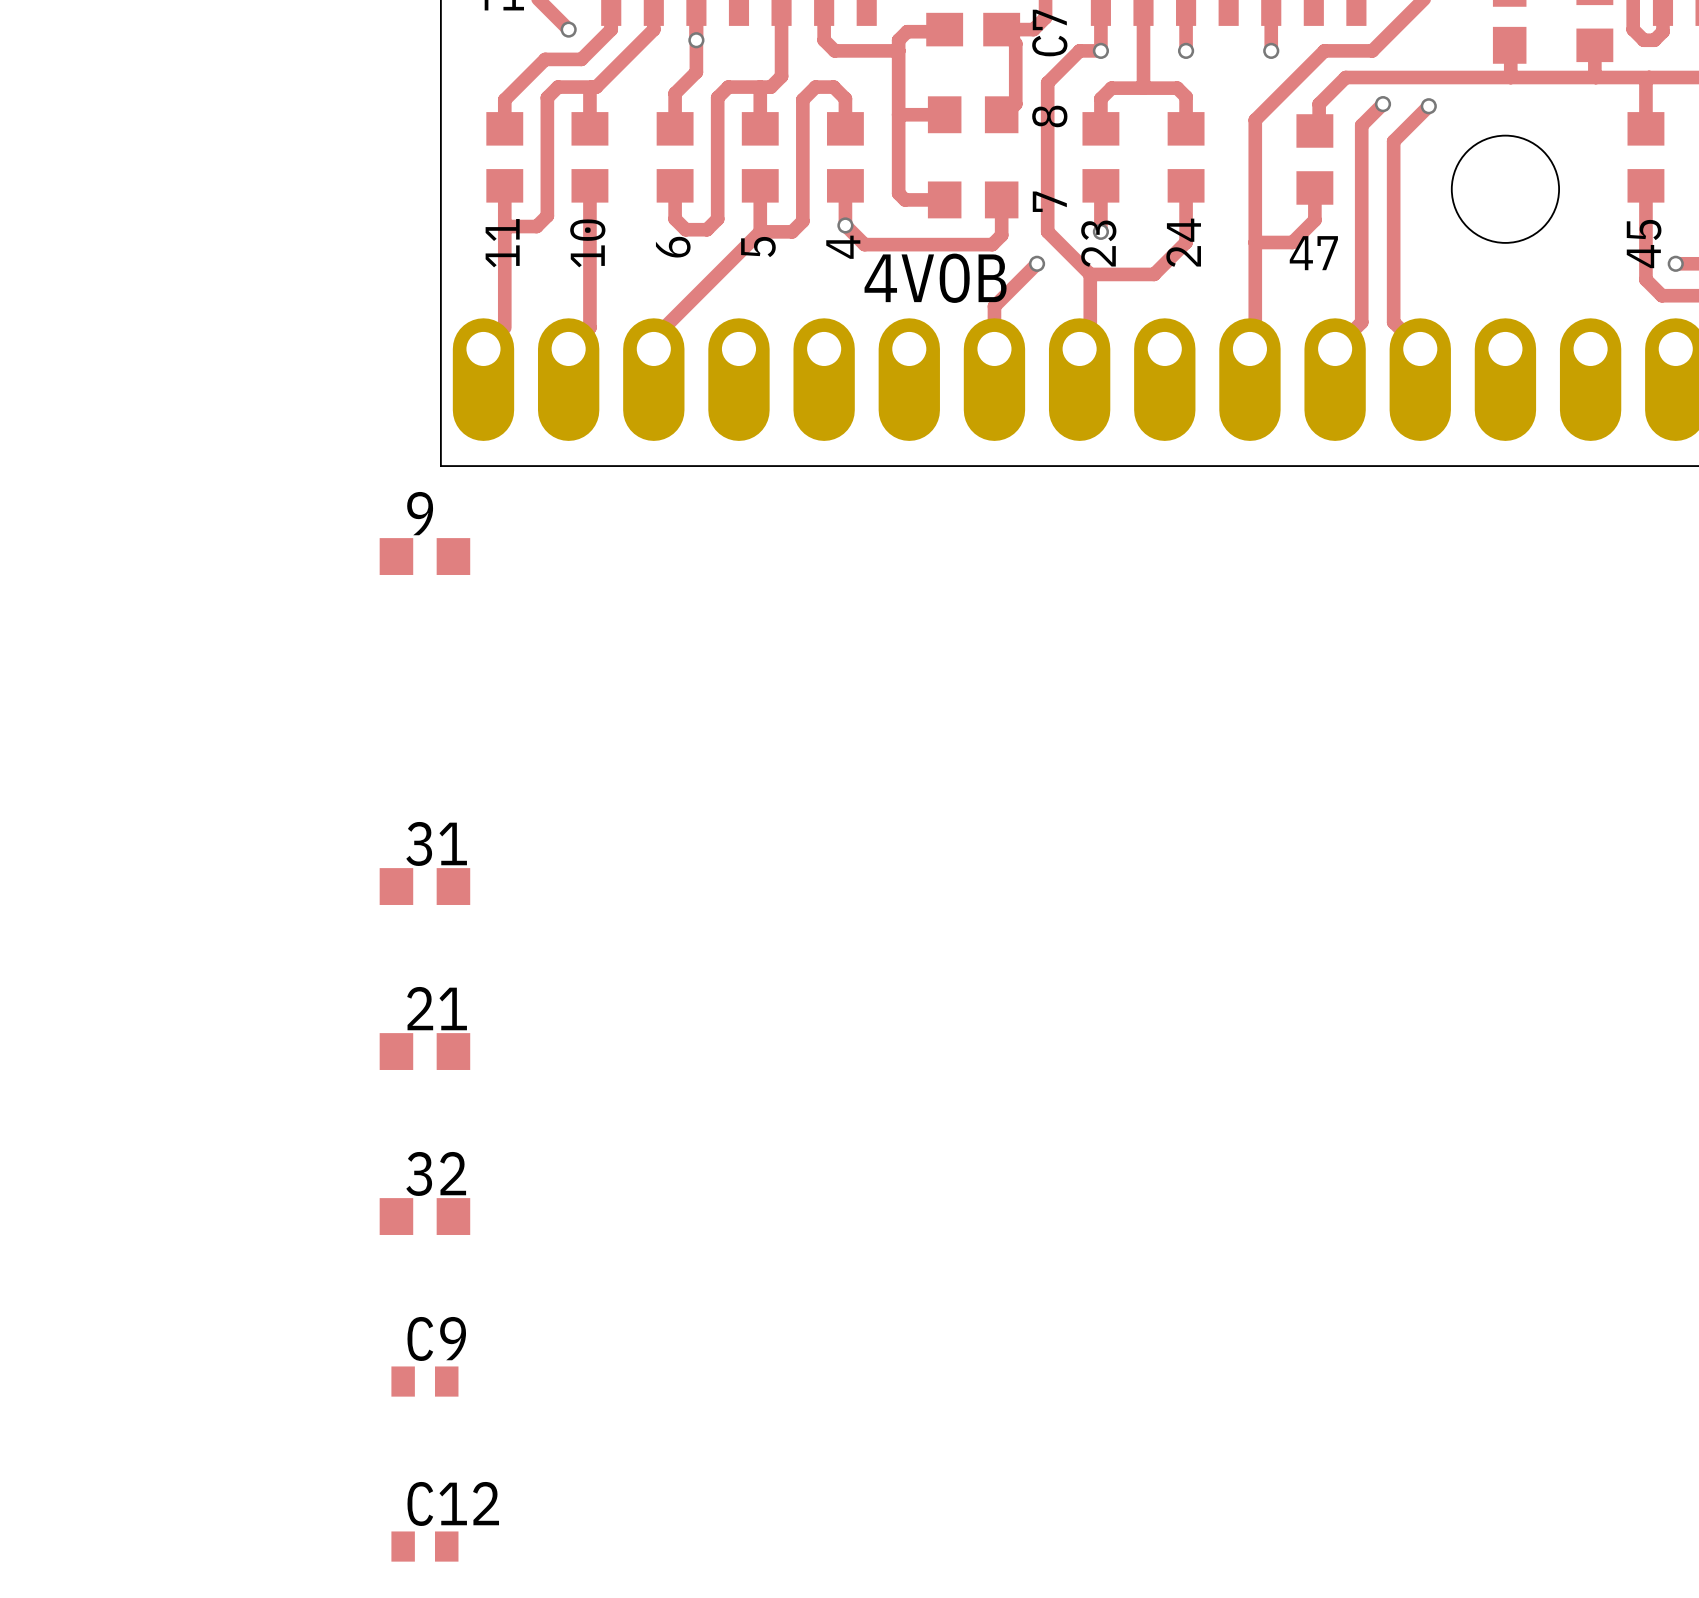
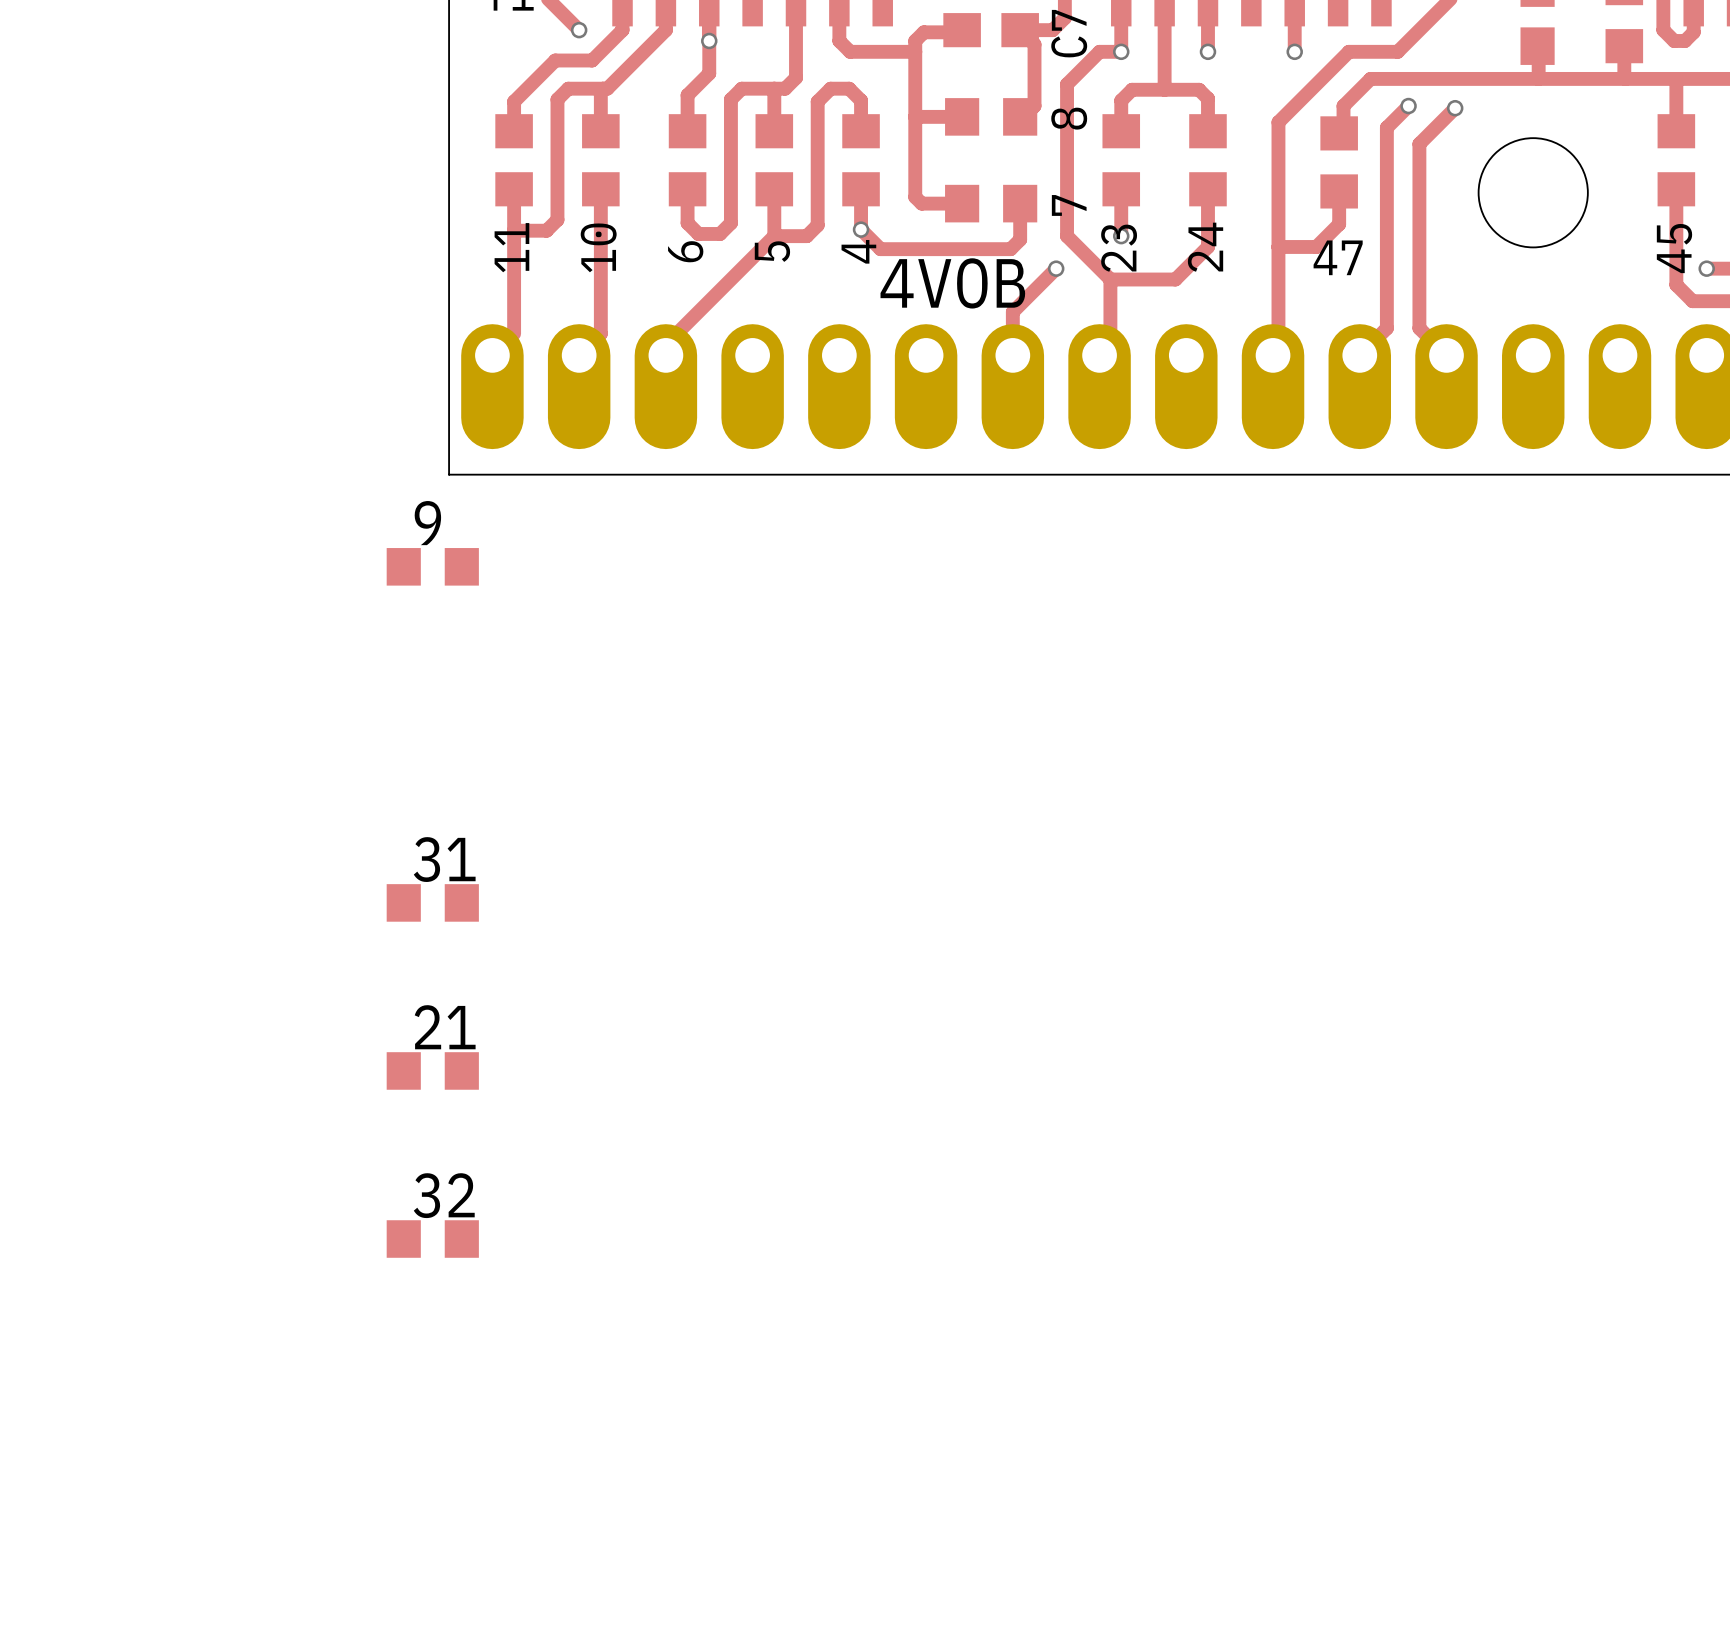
C9: (424, 1381) -> none
C12: (424, 1546) -> none

